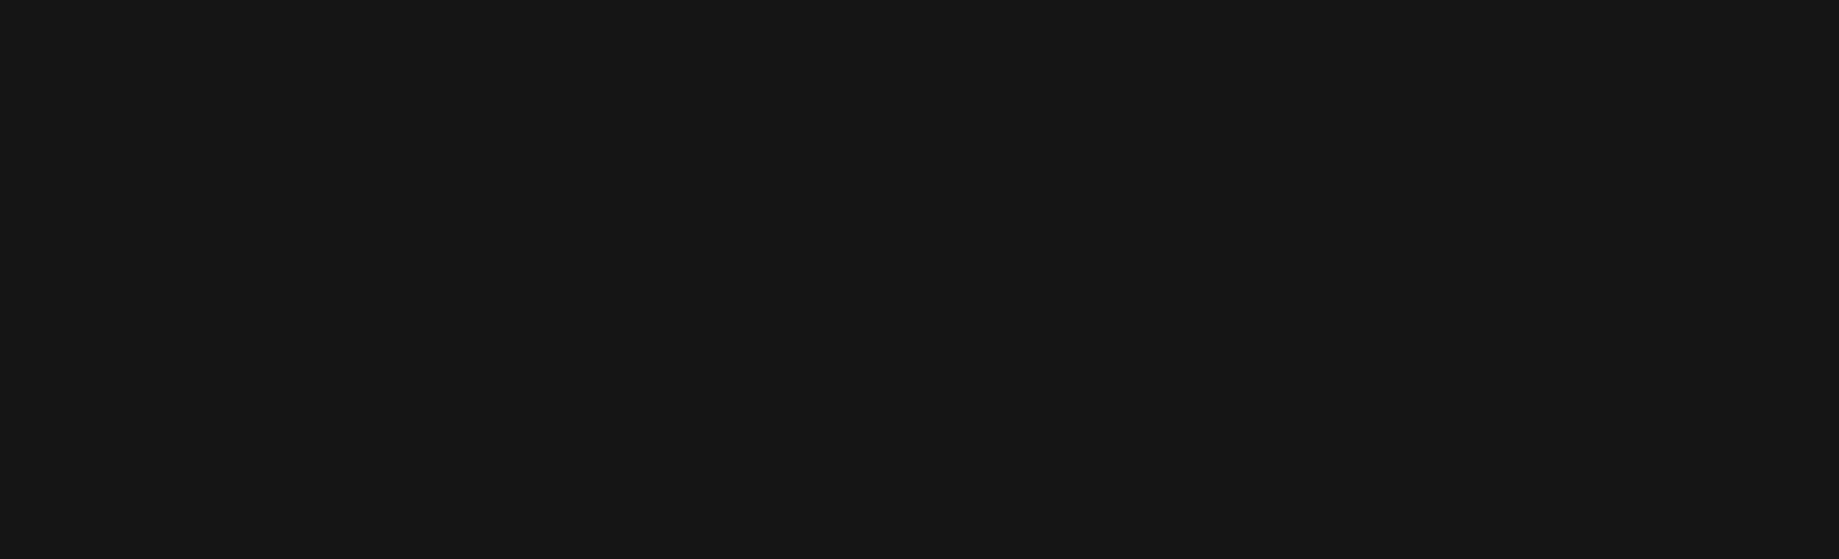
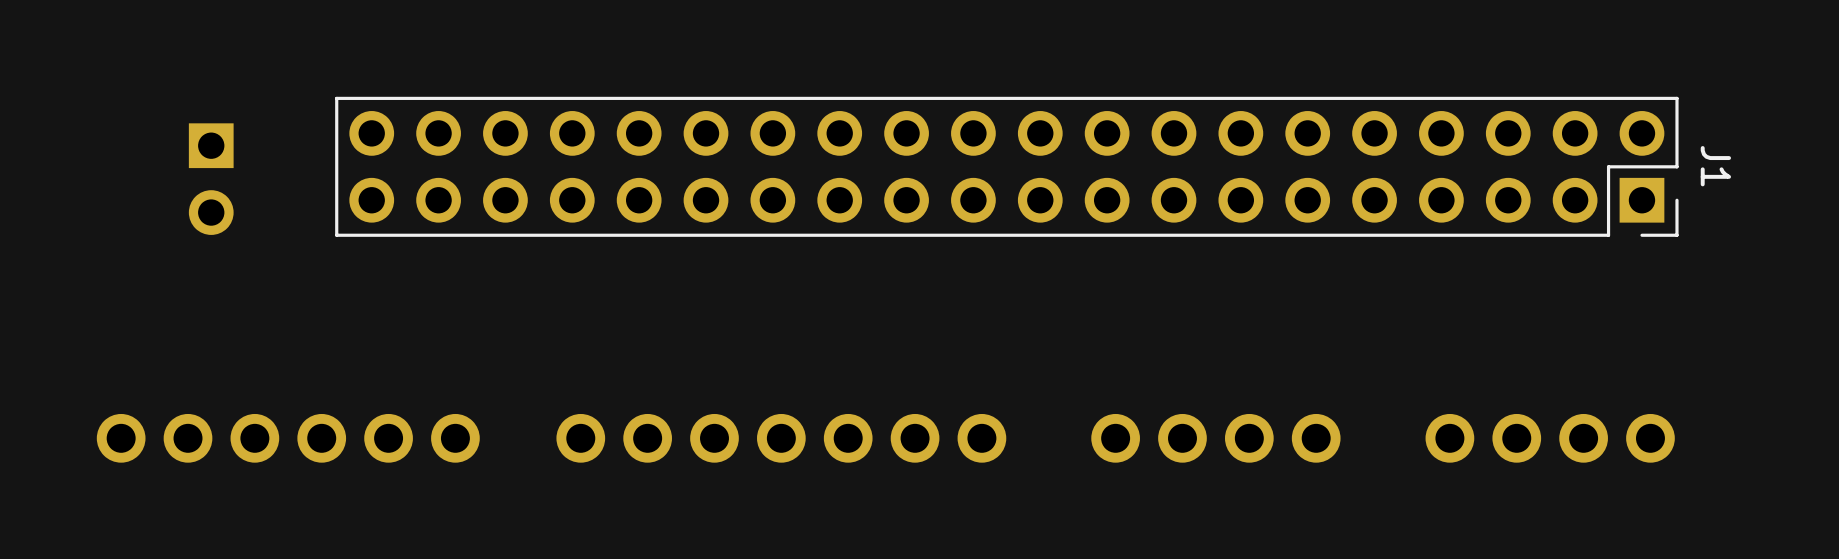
J1: none -> (1006, 166)
part: none -> (211, 179)
part: none -> (288, 438)
part: none -> (781, 438)
part: none -> (1215, 438)
part: none -> (1550, 438)

